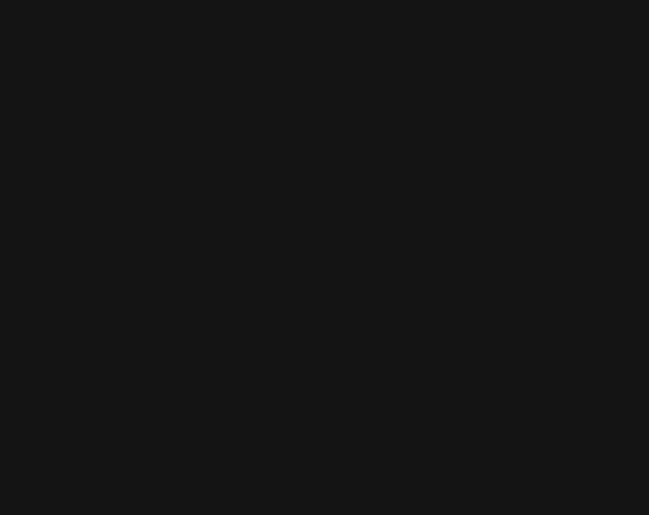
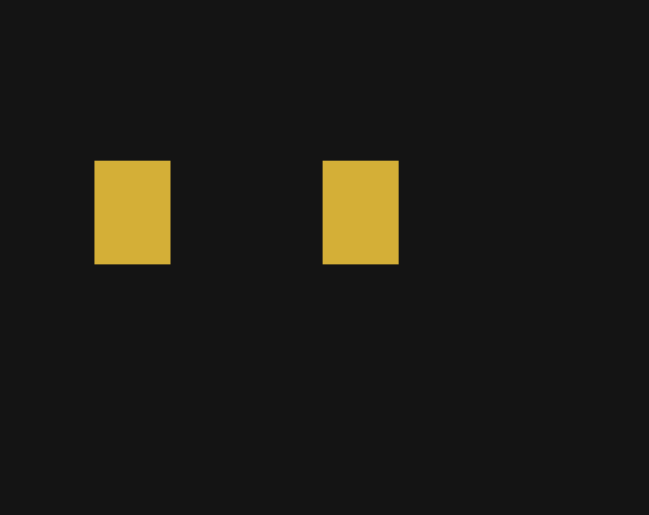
part: none -> (246, 212)

